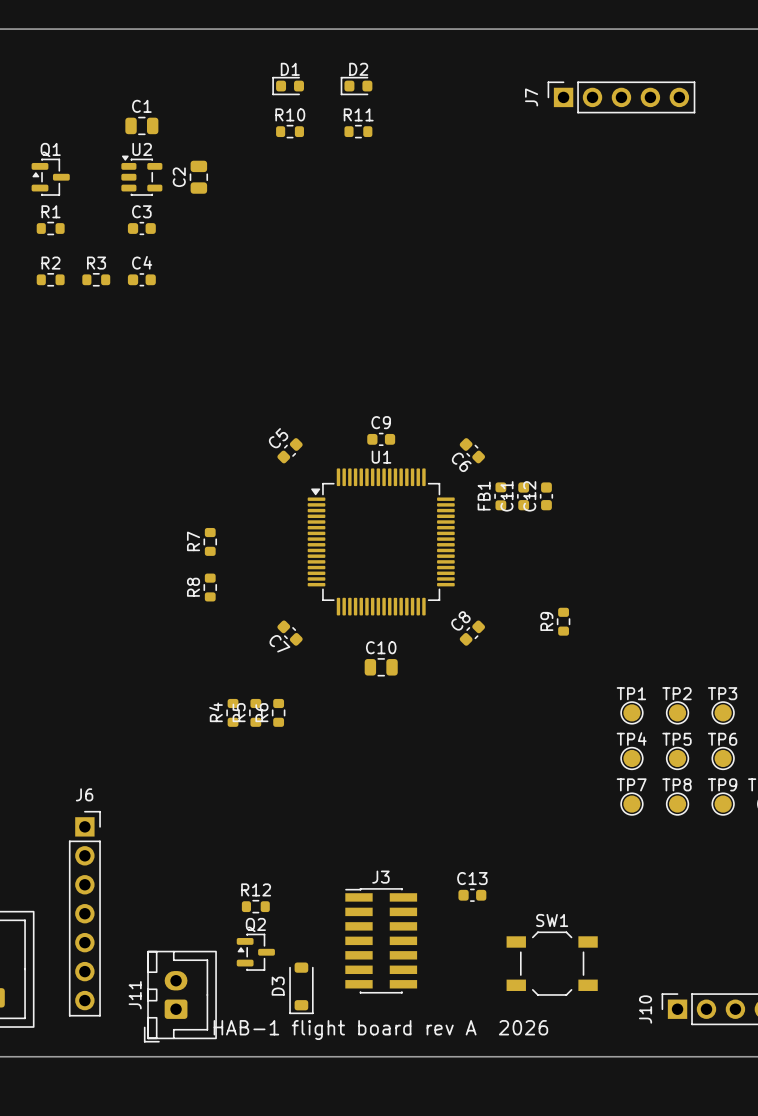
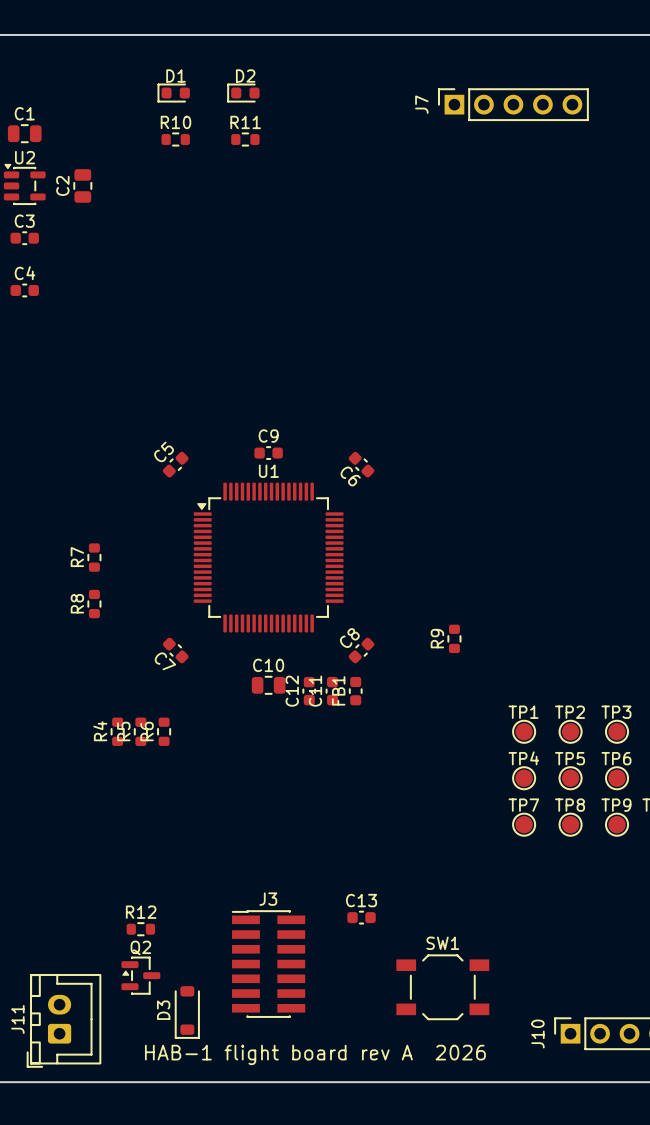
FB1 position: (500, 496) -> (355, 691)
C11 position: (523, 496) -> (332, 691)
C12 position: (546, 496) -> (309, 691)
text position: HAB-1 flight board rev A 2026 (380, 1030) -> HAB-1 flight board rev A 2026 (315, 1054)

